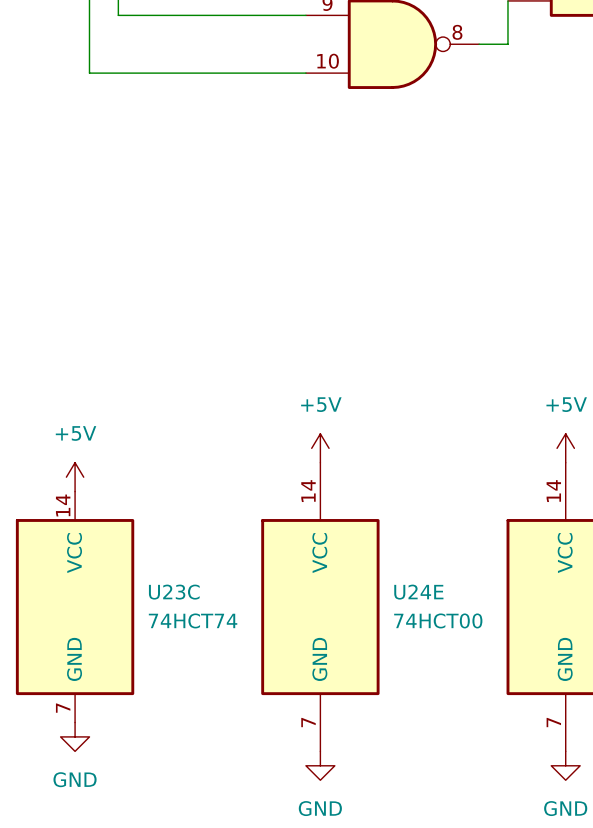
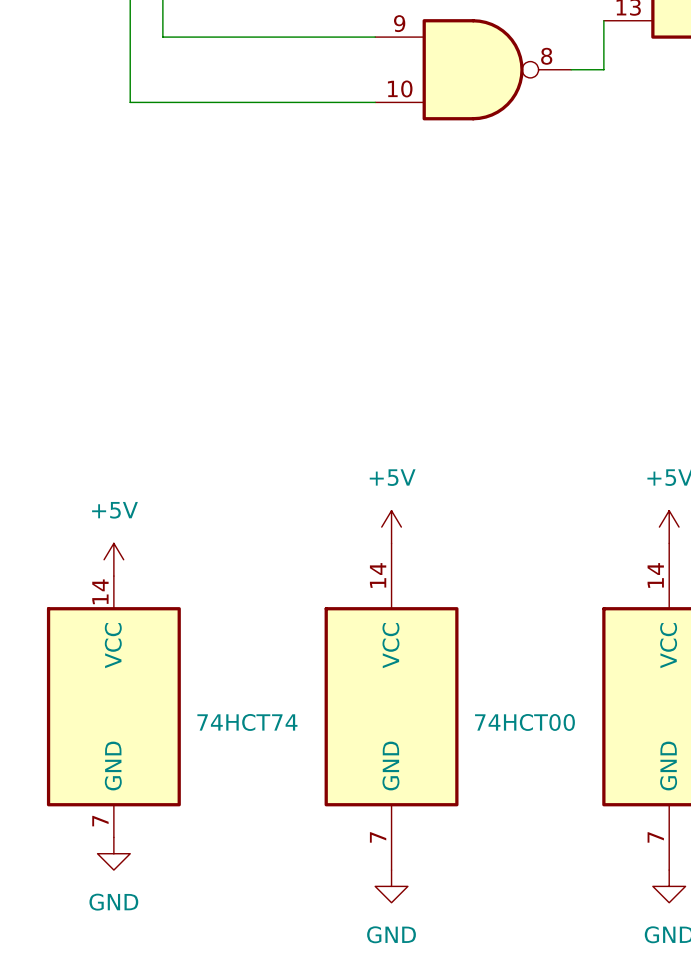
U23C name: U23C (174, 592) -> none
U24E name: U24E (418, 592) -> none

